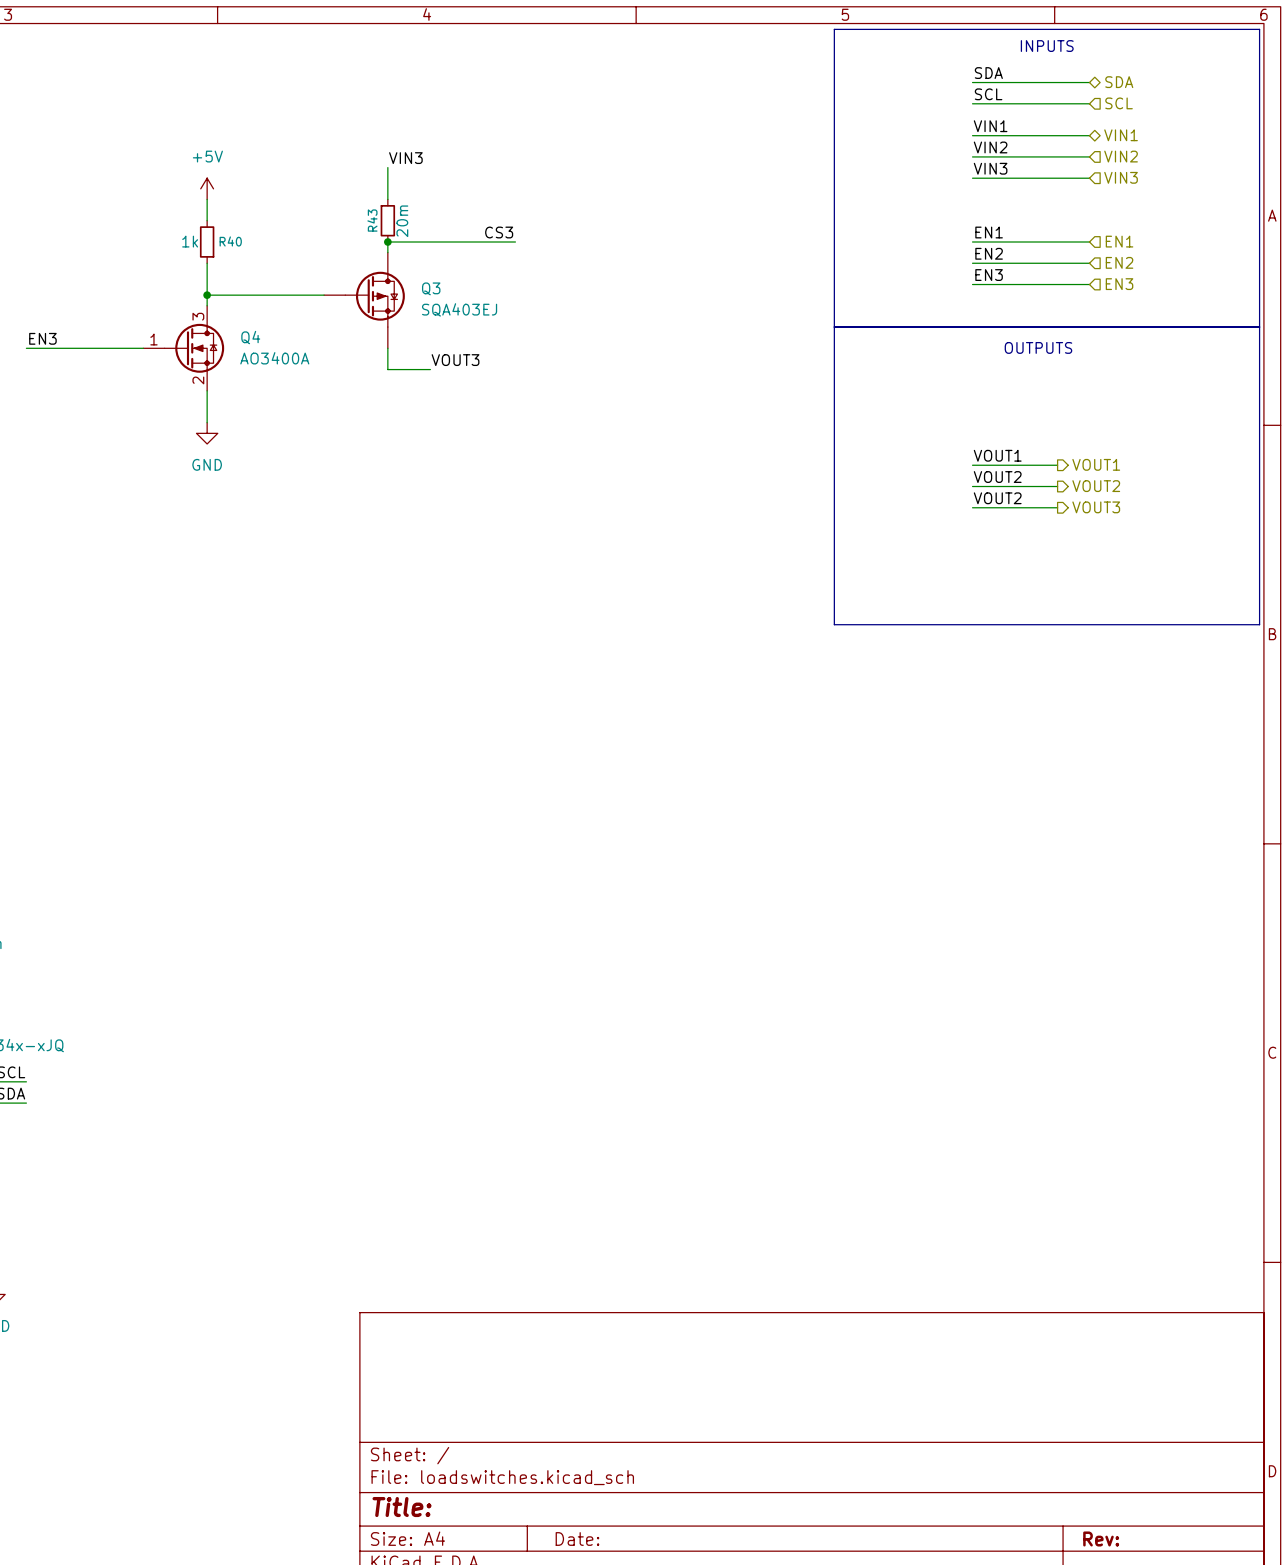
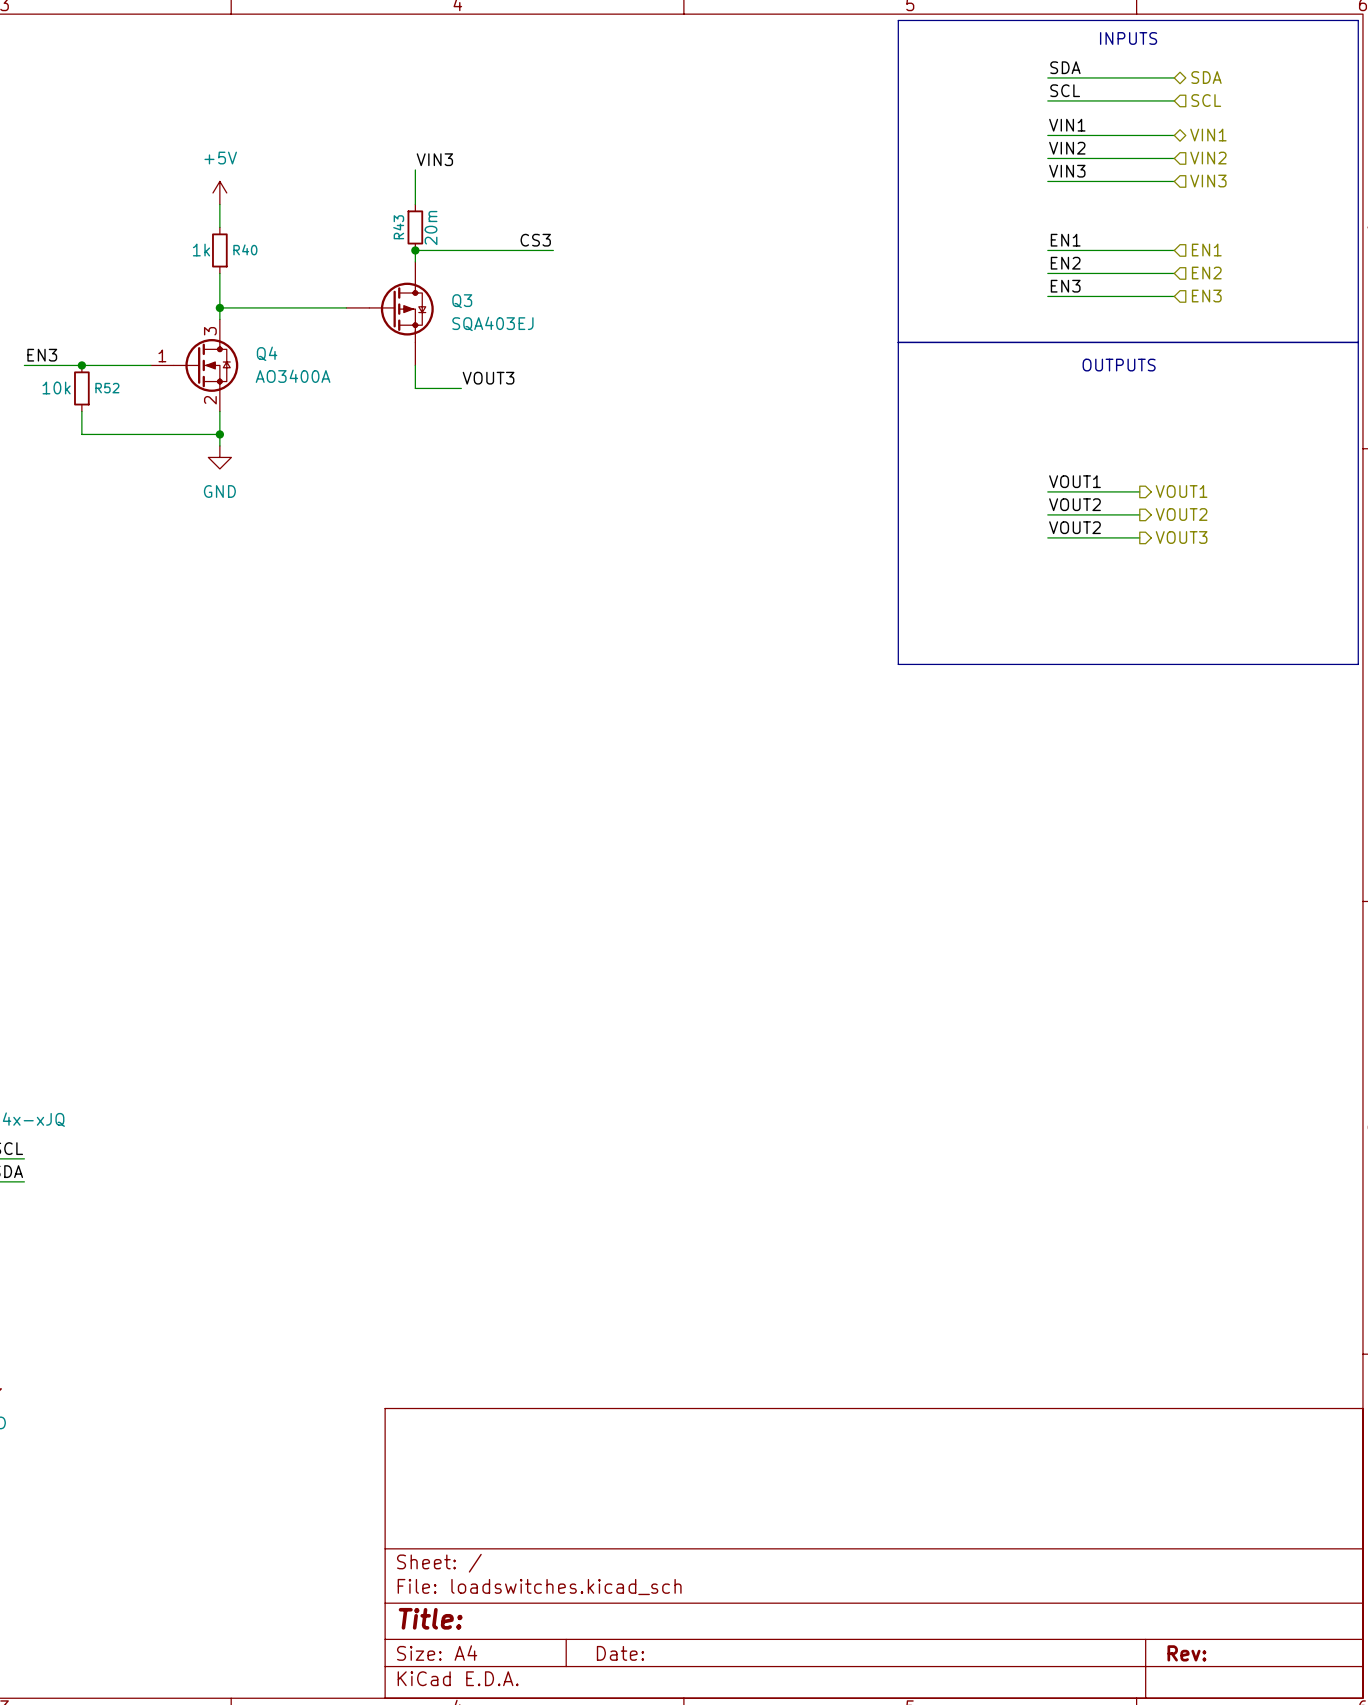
junction: none -> (81, 365)
R52: none -> 10k (81, 388)
wire: none -> (81, 411) (81, 434) (219, 434)
junction: none -> (219, 434)

